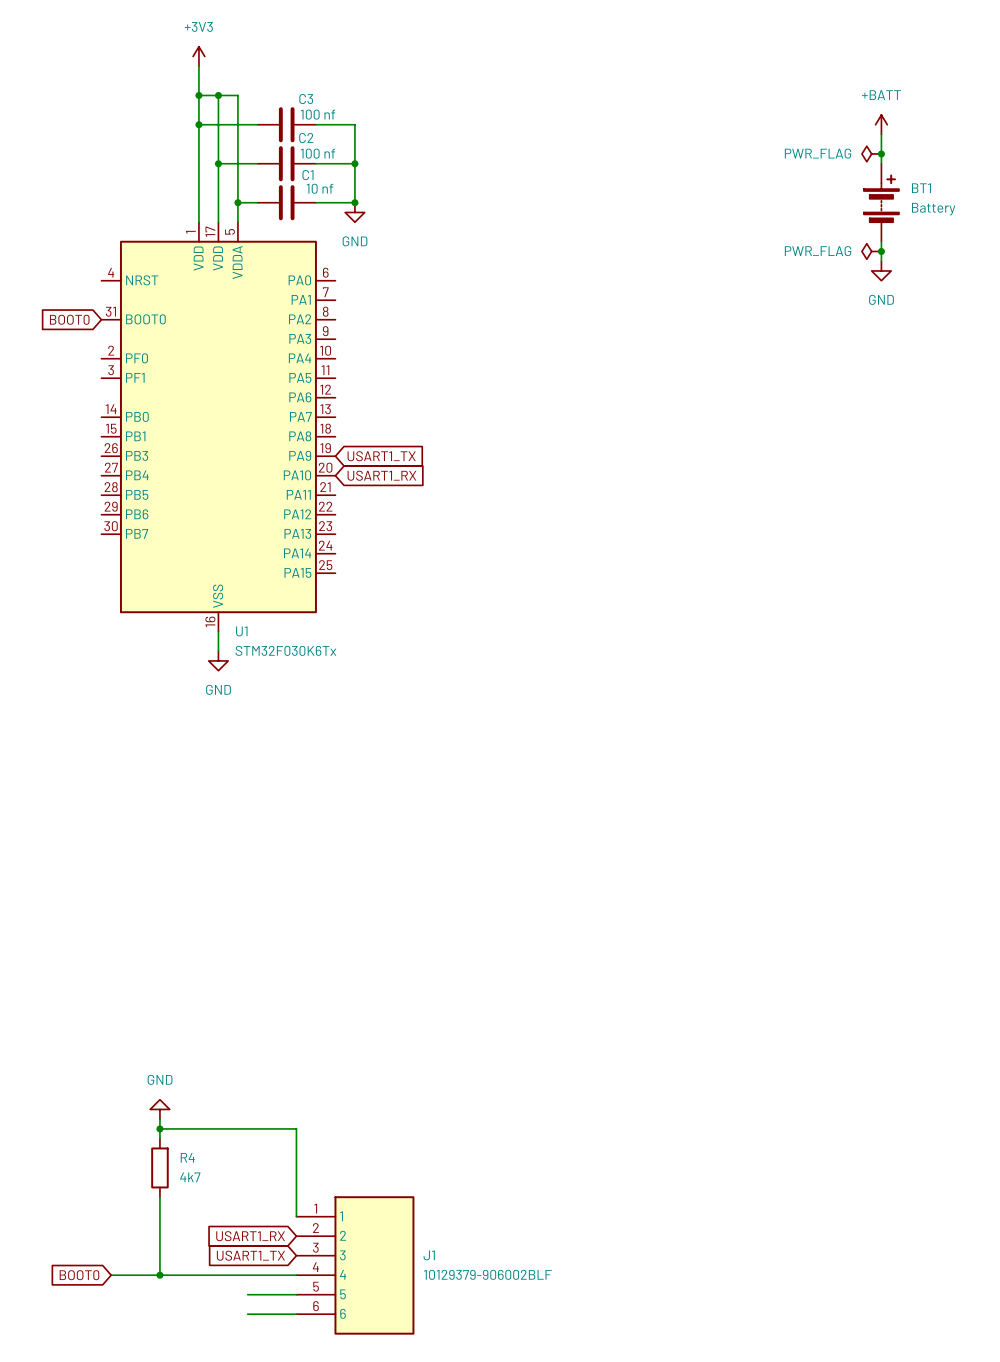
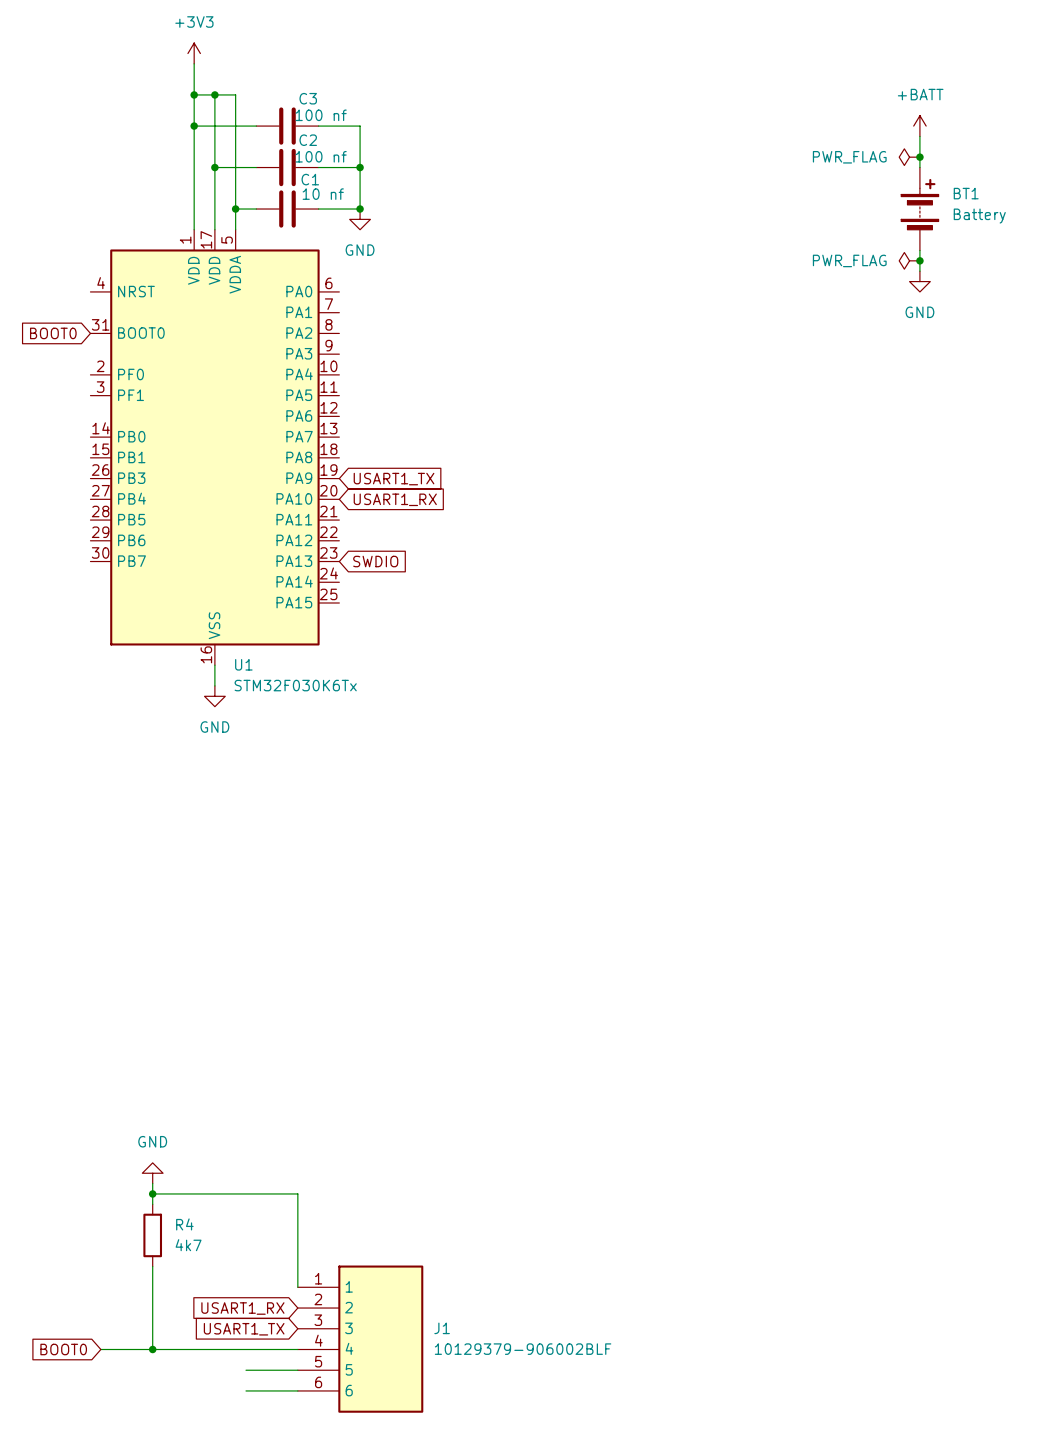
global label: none -> SWDIO (375, 561)

